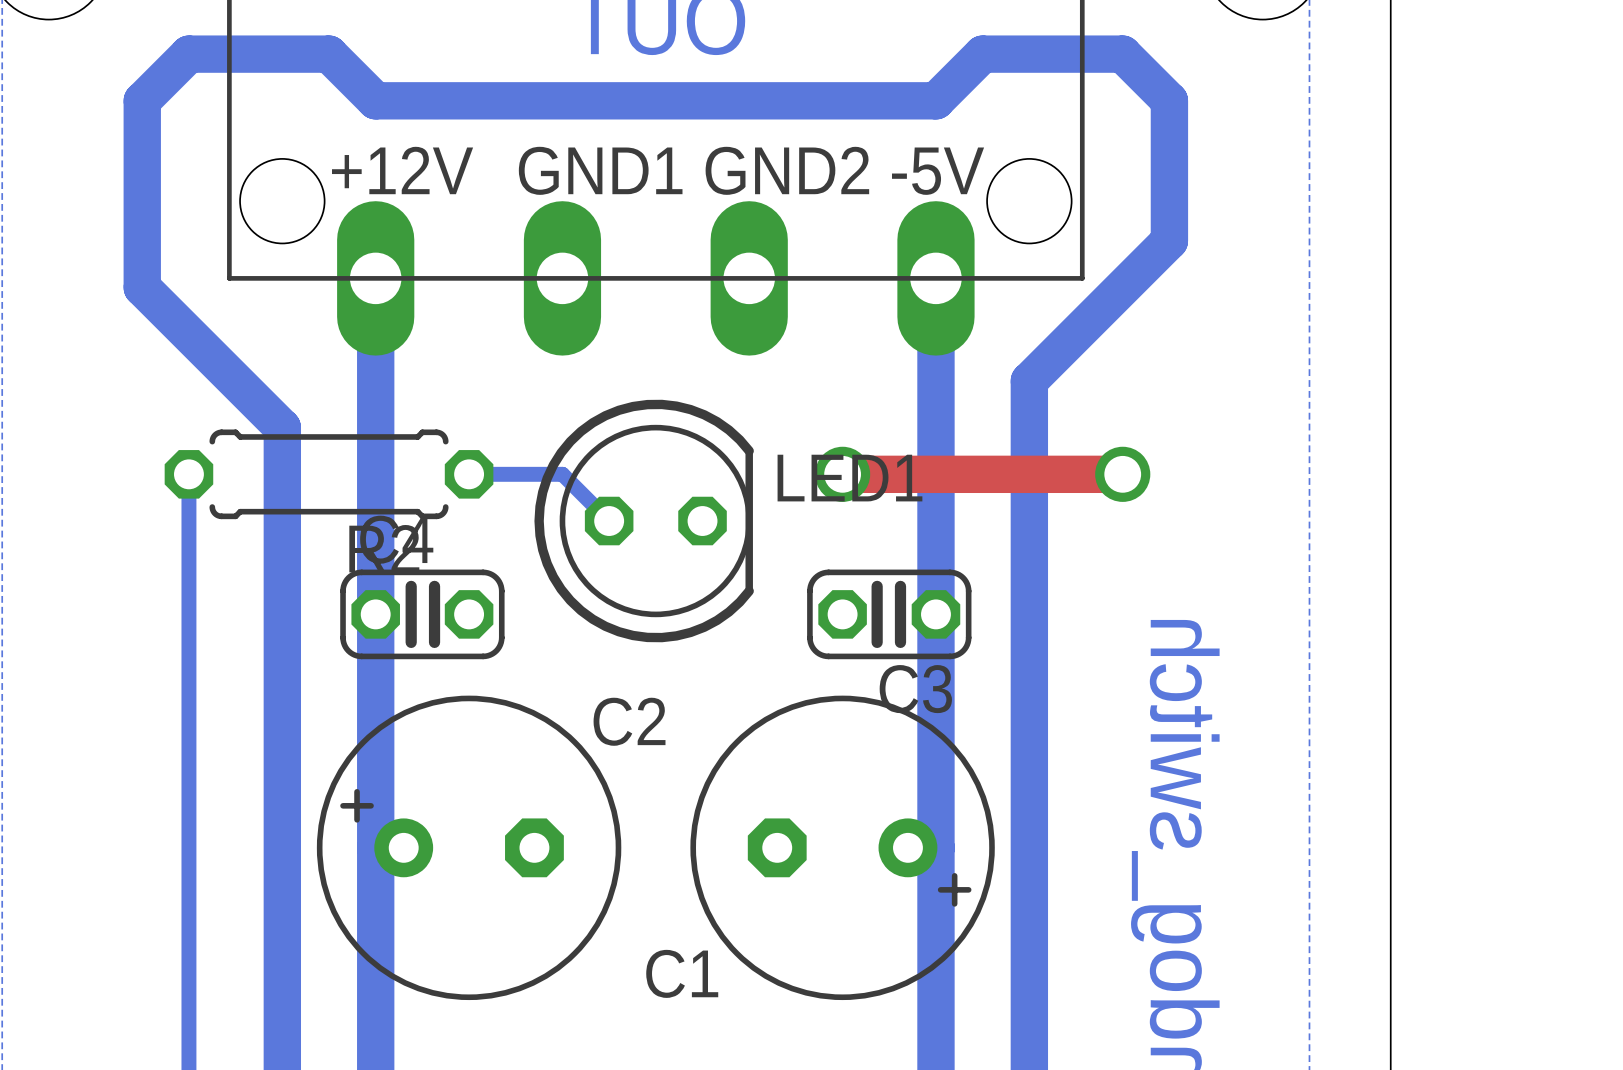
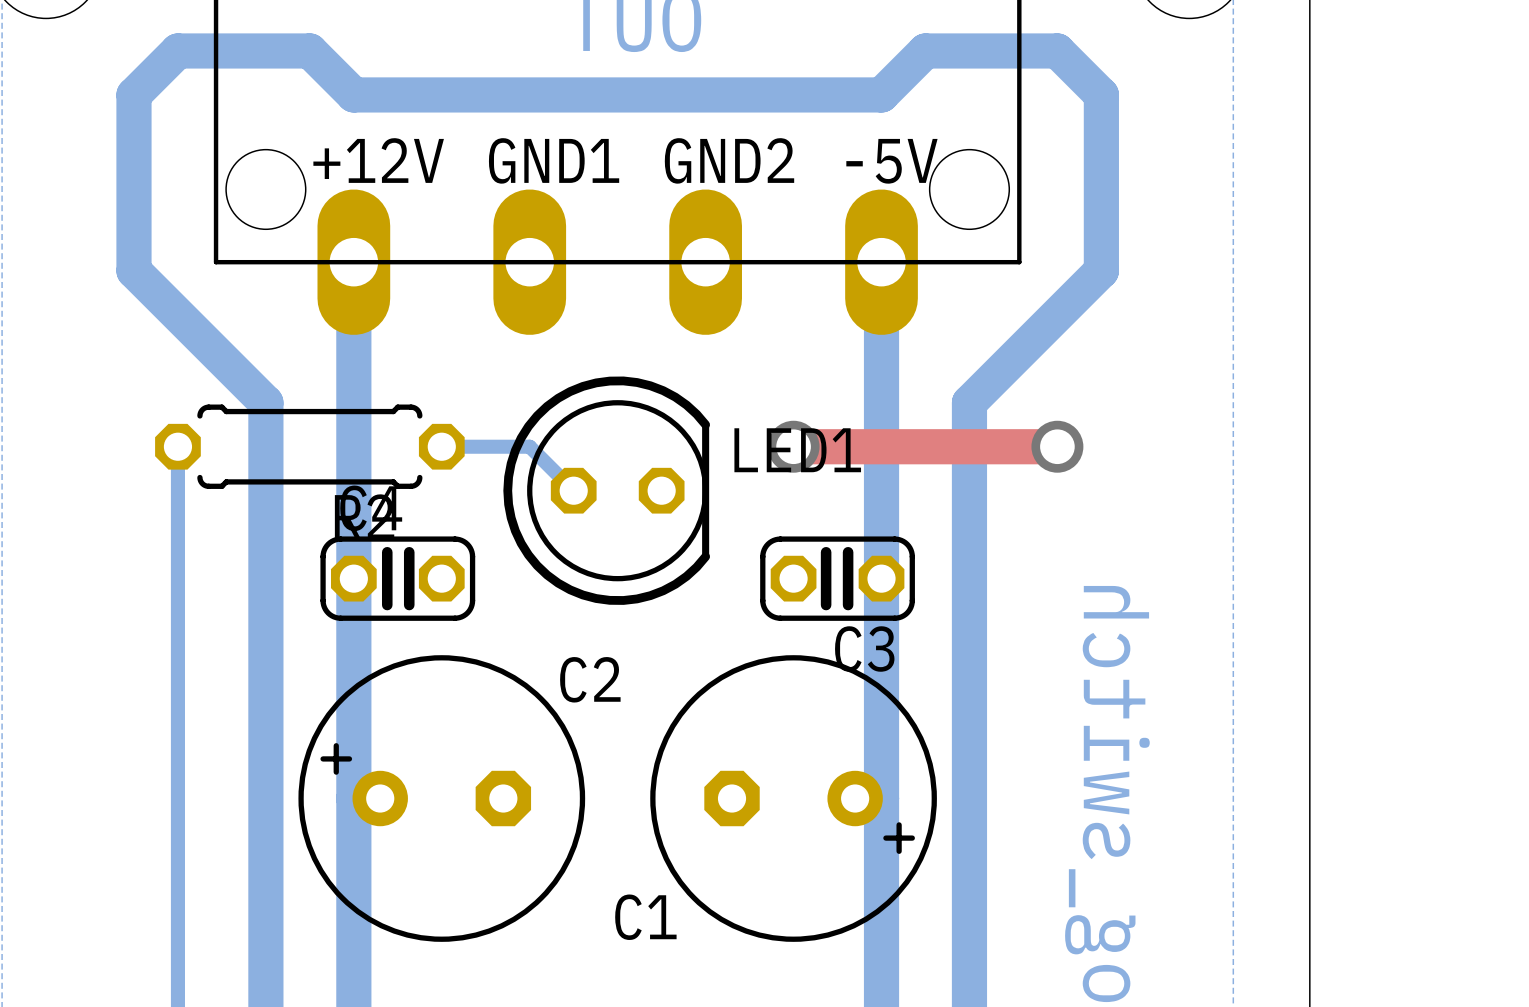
bottom track: (1169, 240) (1029, 380) (1029, 427) -> (1101, 226) (1101, 270) (969, 402)

